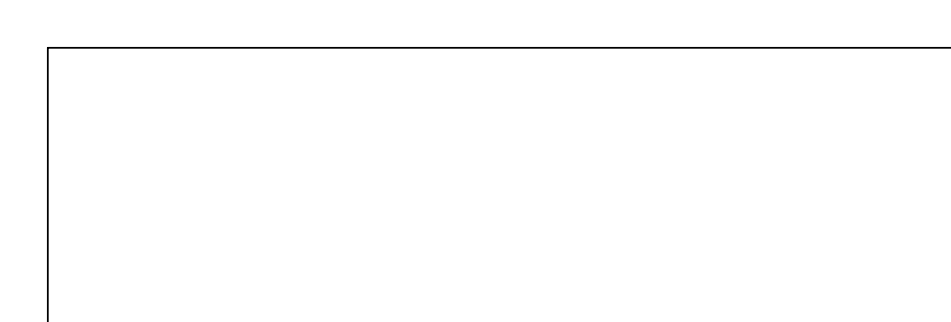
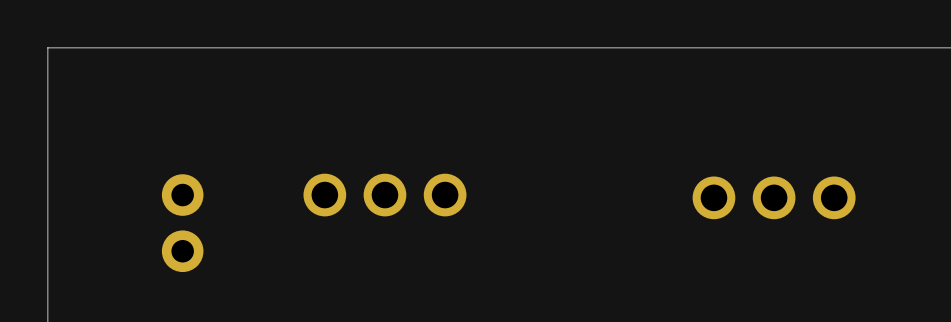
part: none -> (384, 195)
part: none -> (774, 197)
part: none -> (182, 223)

